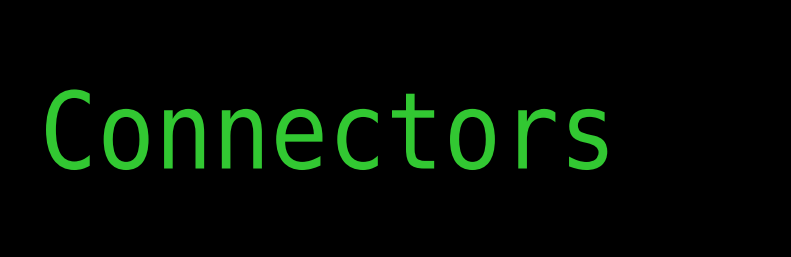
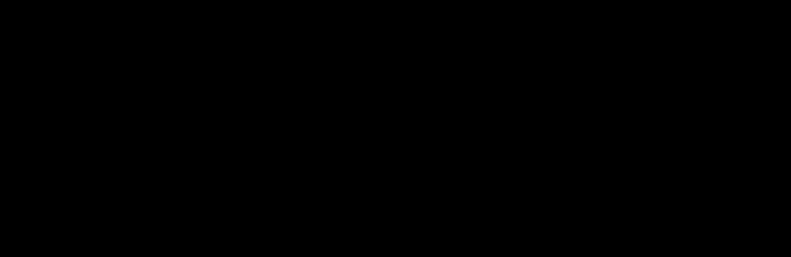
text: Connectors (326, 129) -> none

